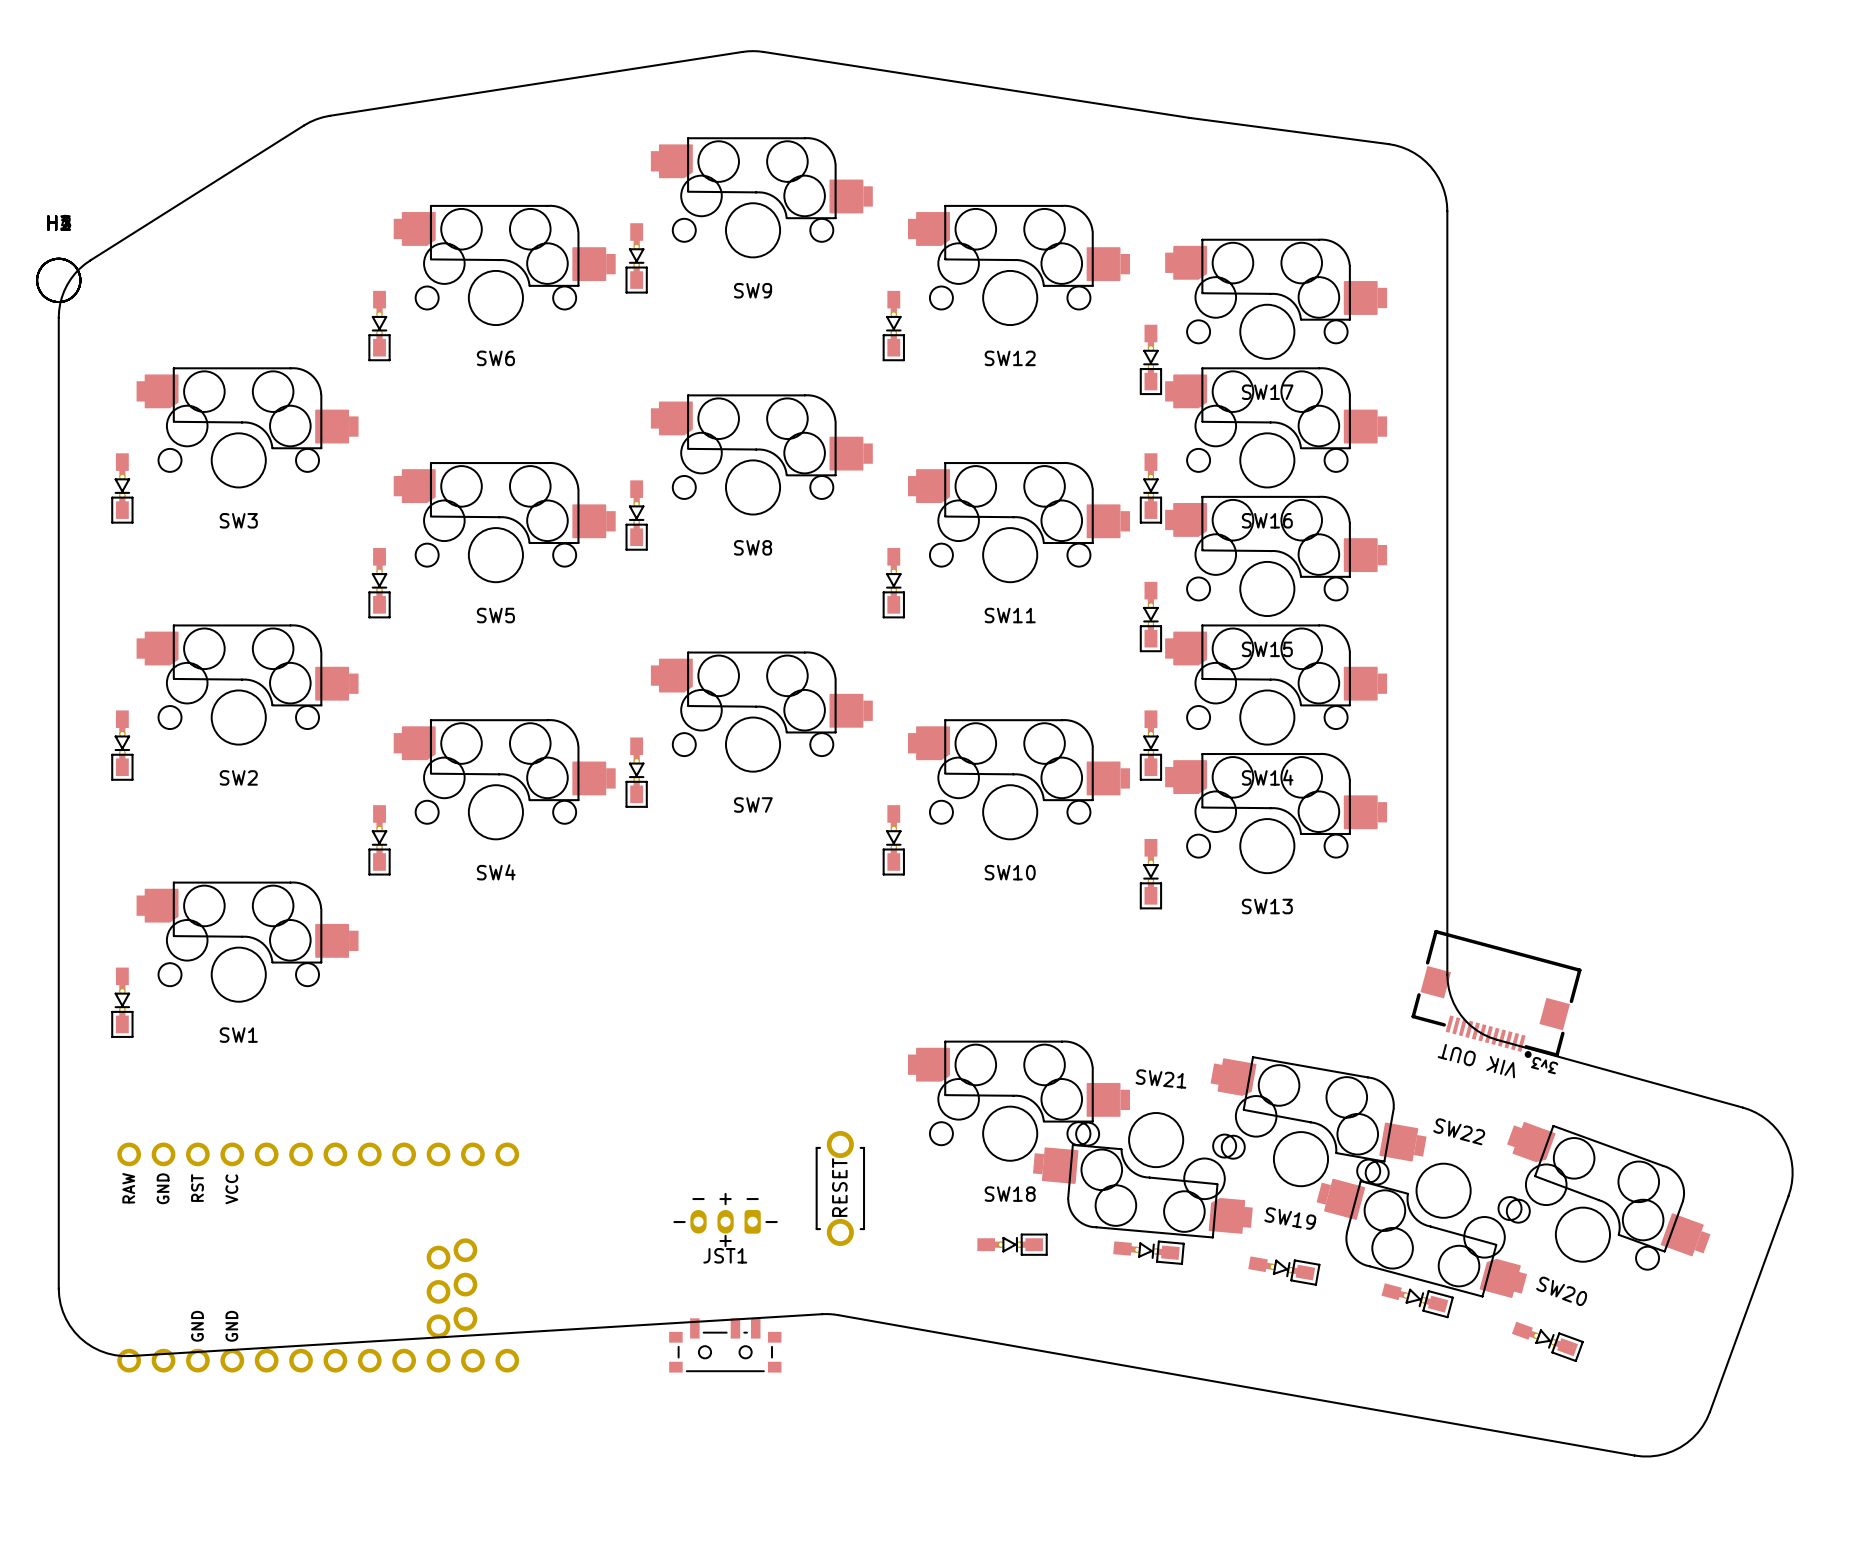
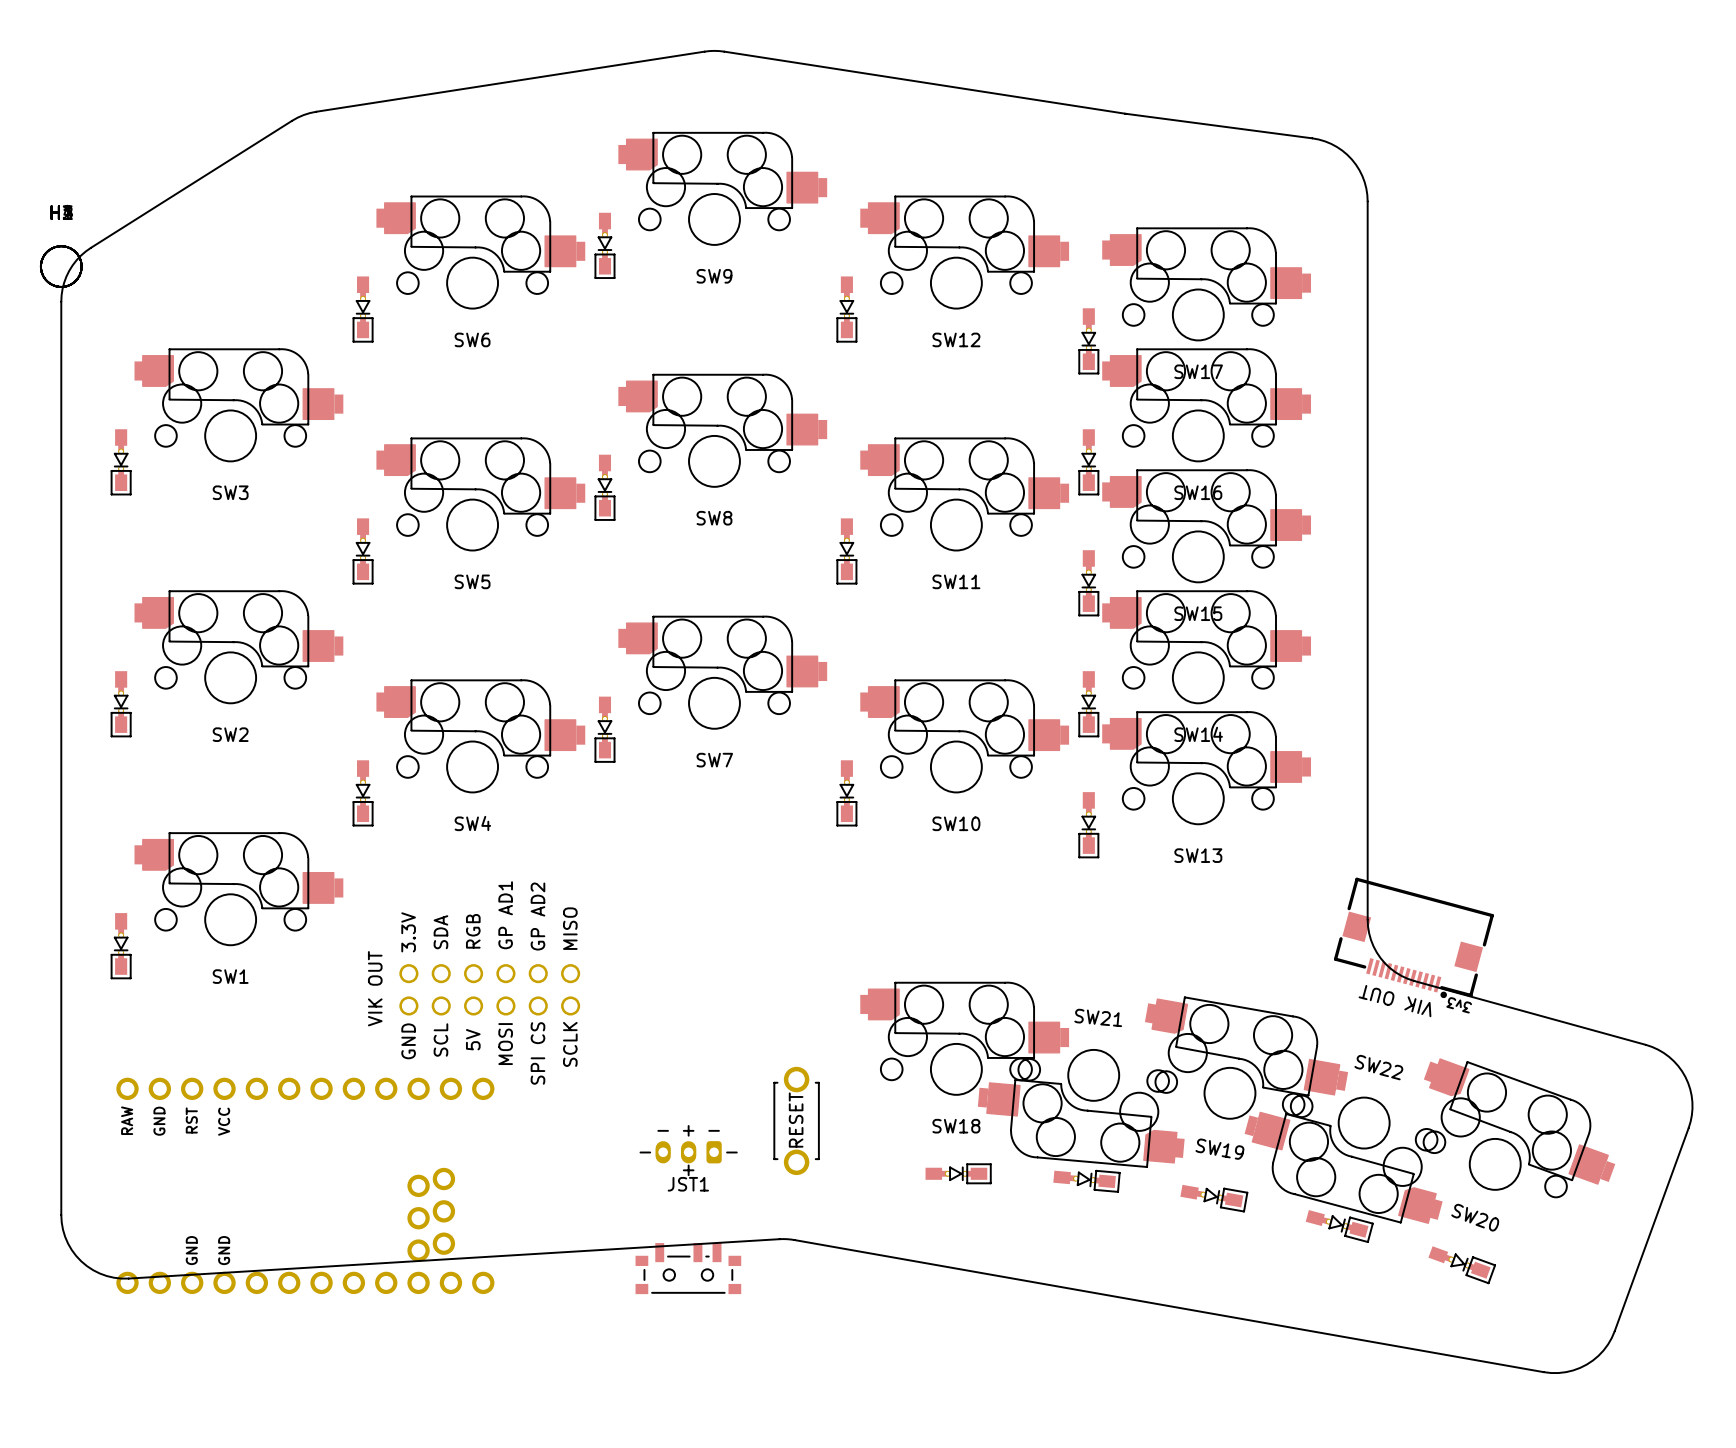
part: none -> (489, 989)

